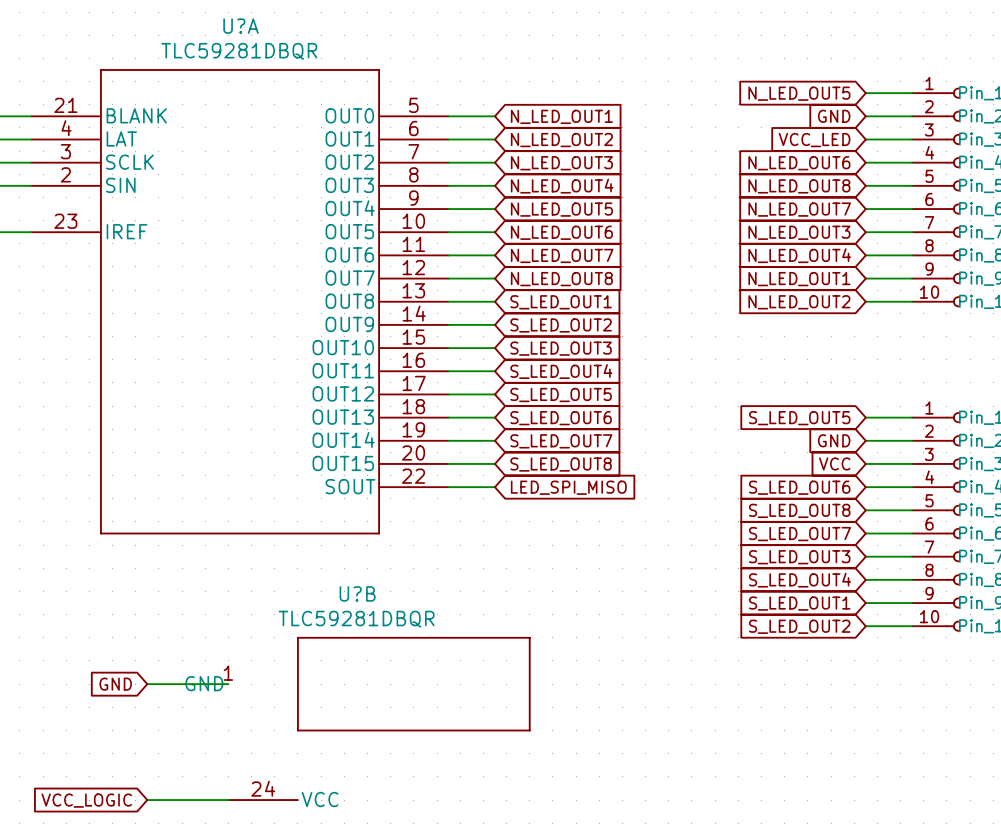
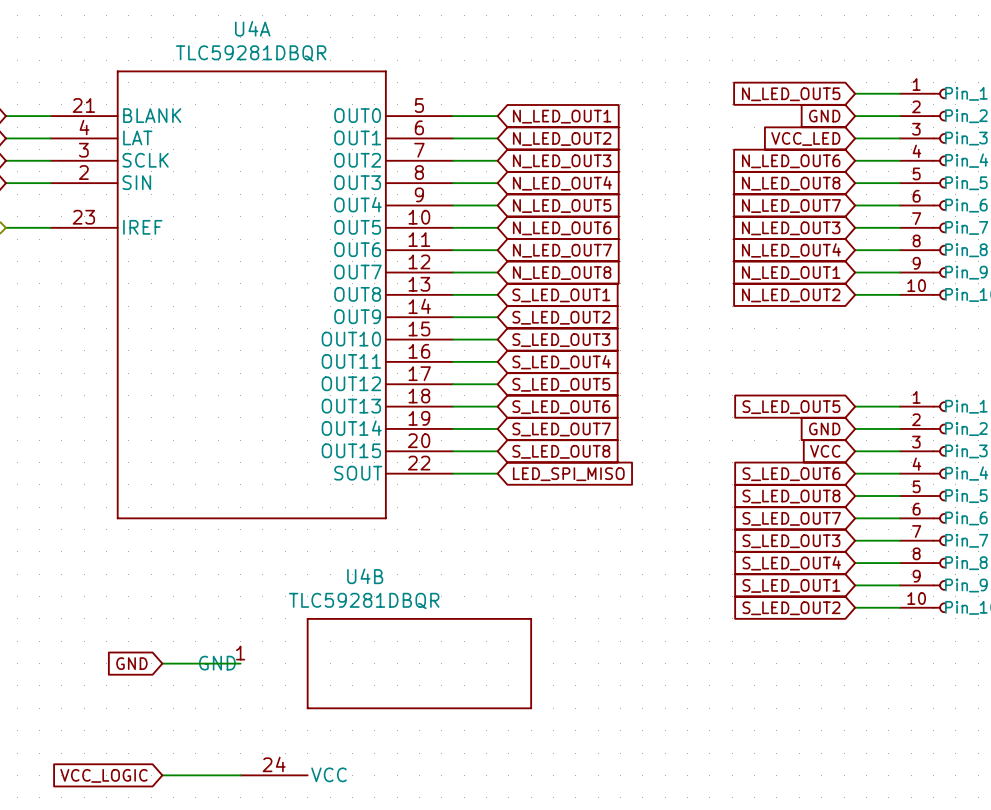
U?A name: U?A (241, 26) -> U4A (252, 28)
U?B name: U?B (357, 593) -> U4B (365, 576)

